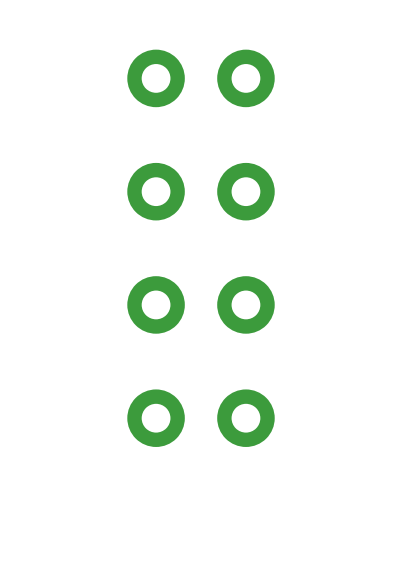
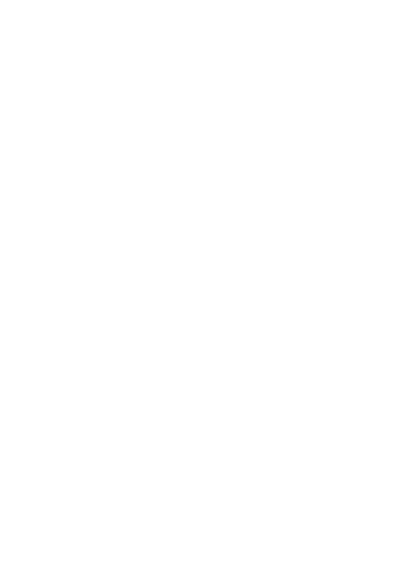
part: (201, 78) -> none
part: (201, 191) -> none
part: (201, 304) -> none
part: (201, 418) -> none

